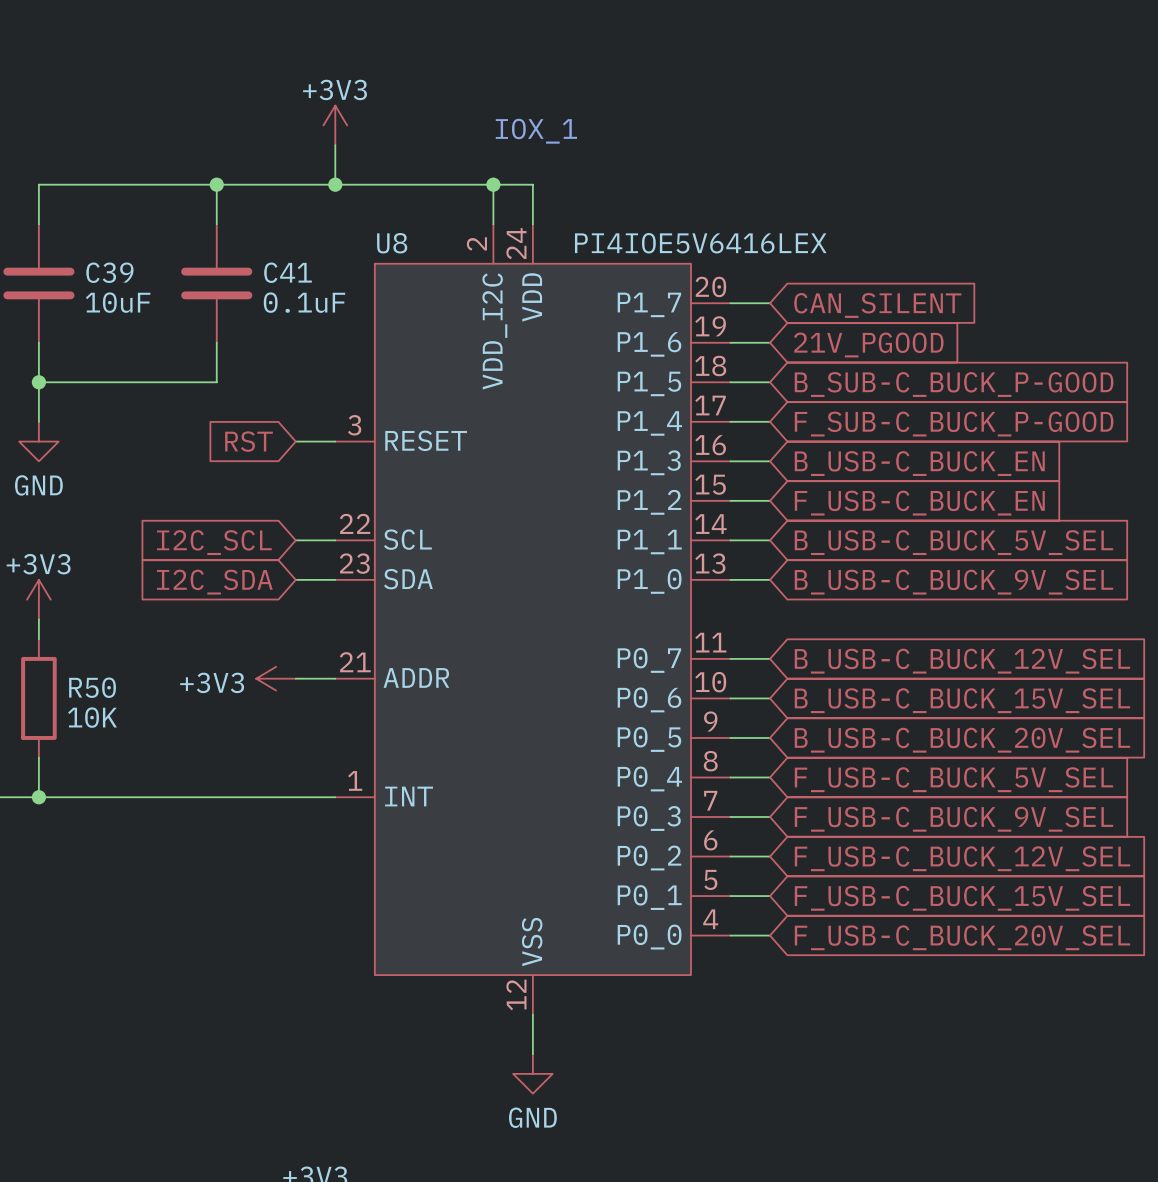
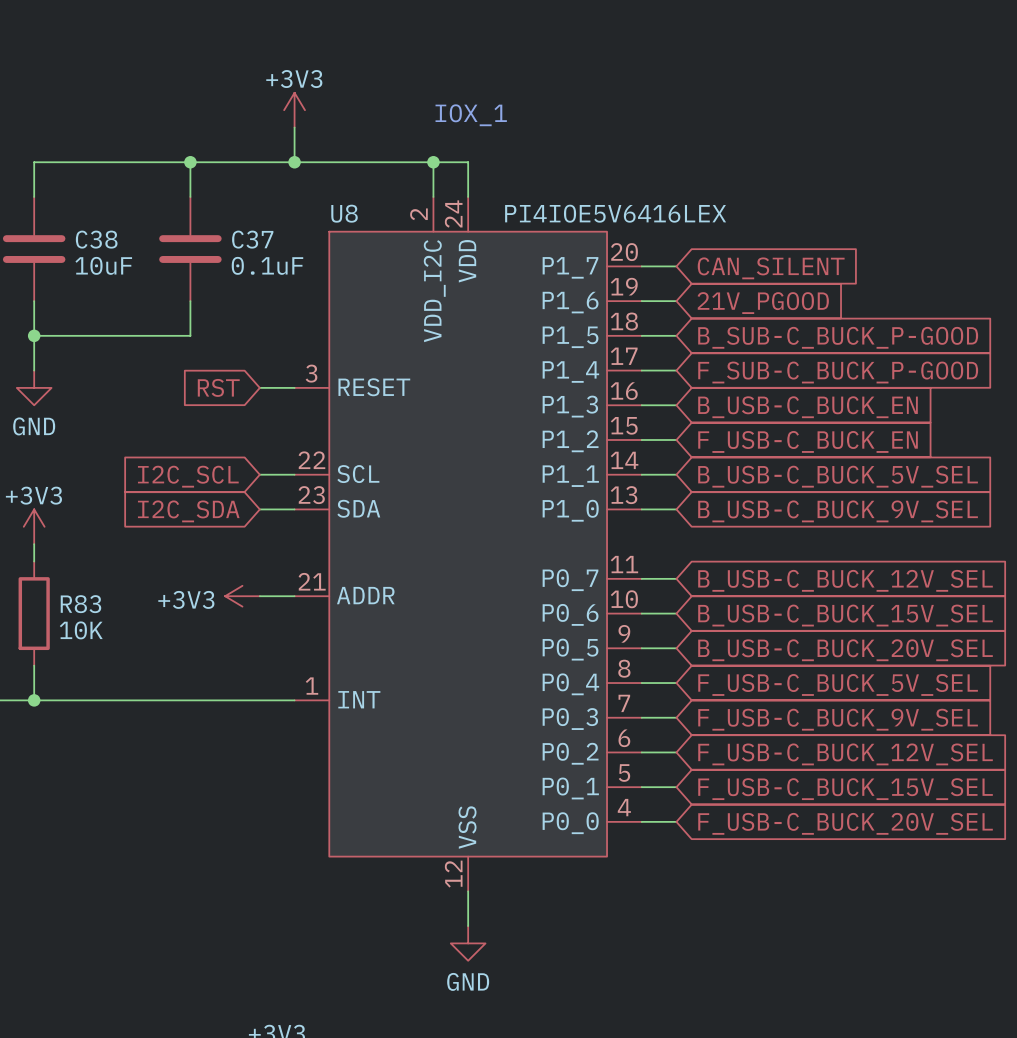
C39 name: C39 (109, 272) -> C38 (96, 239)
C41 name: C41 (288, 272) -> C37 (252, 239)
R50 name: R50 (92, 687) -> R83 (80, 604)

